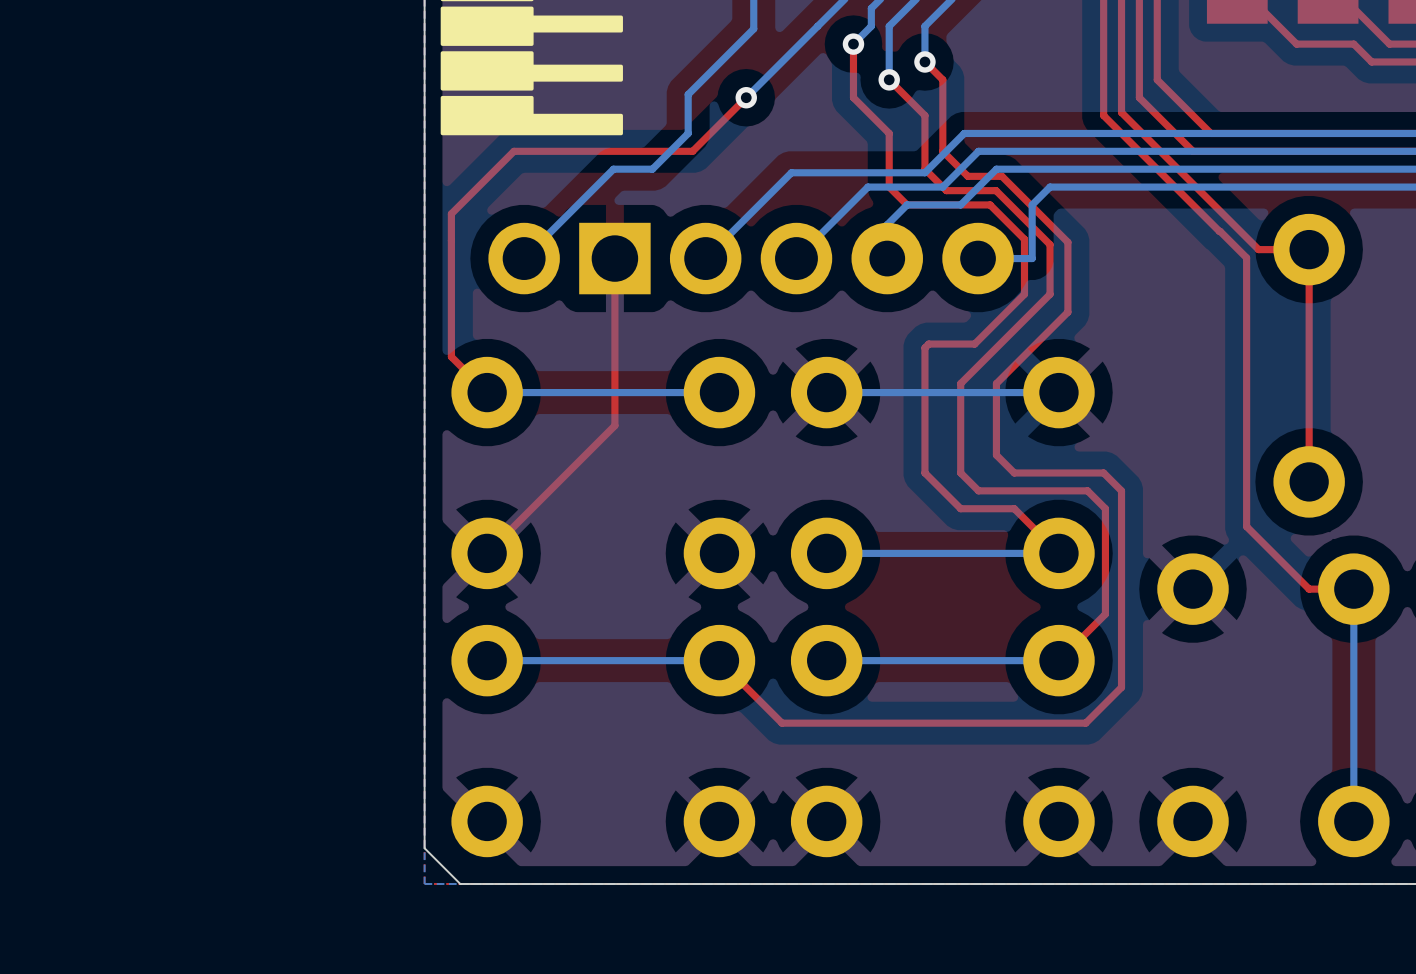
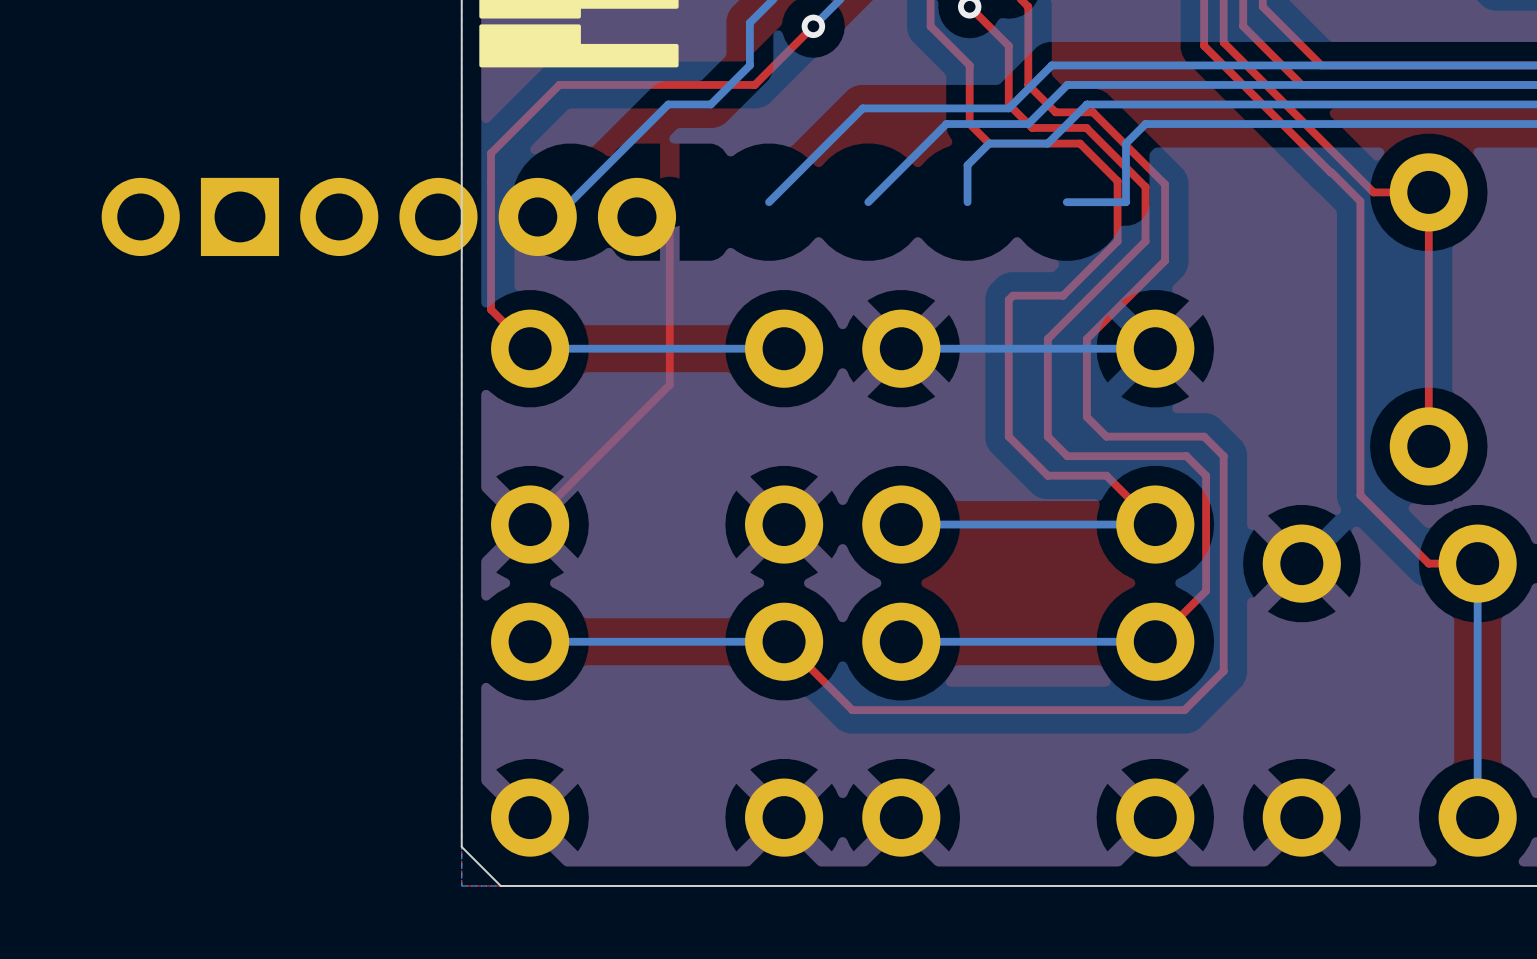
part position: (751, 258) -> (388, 216)

